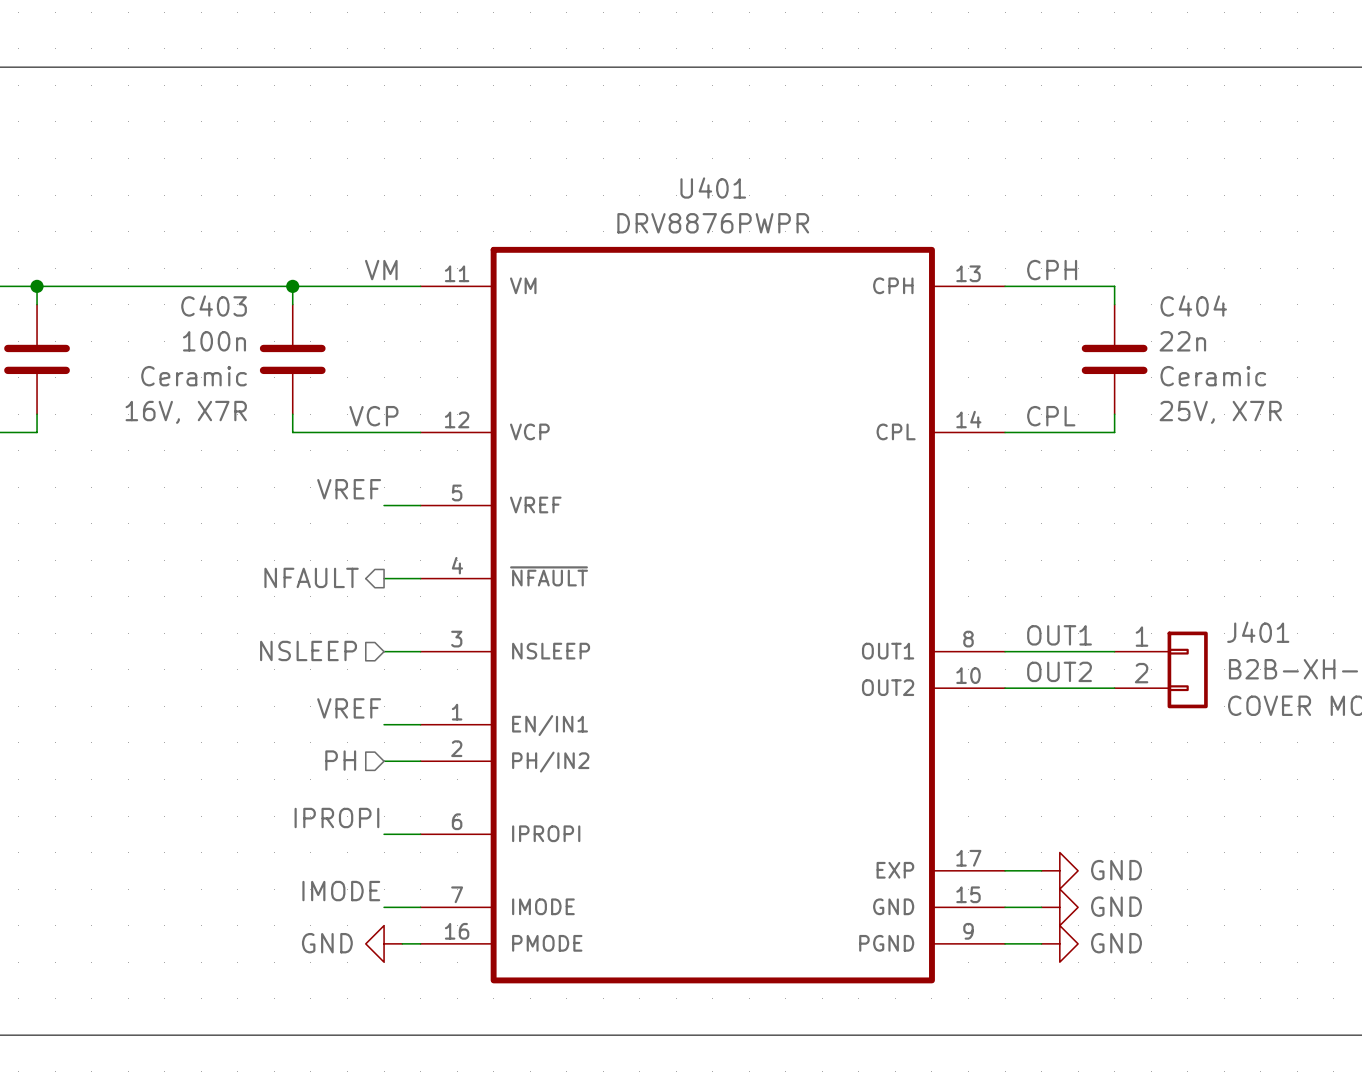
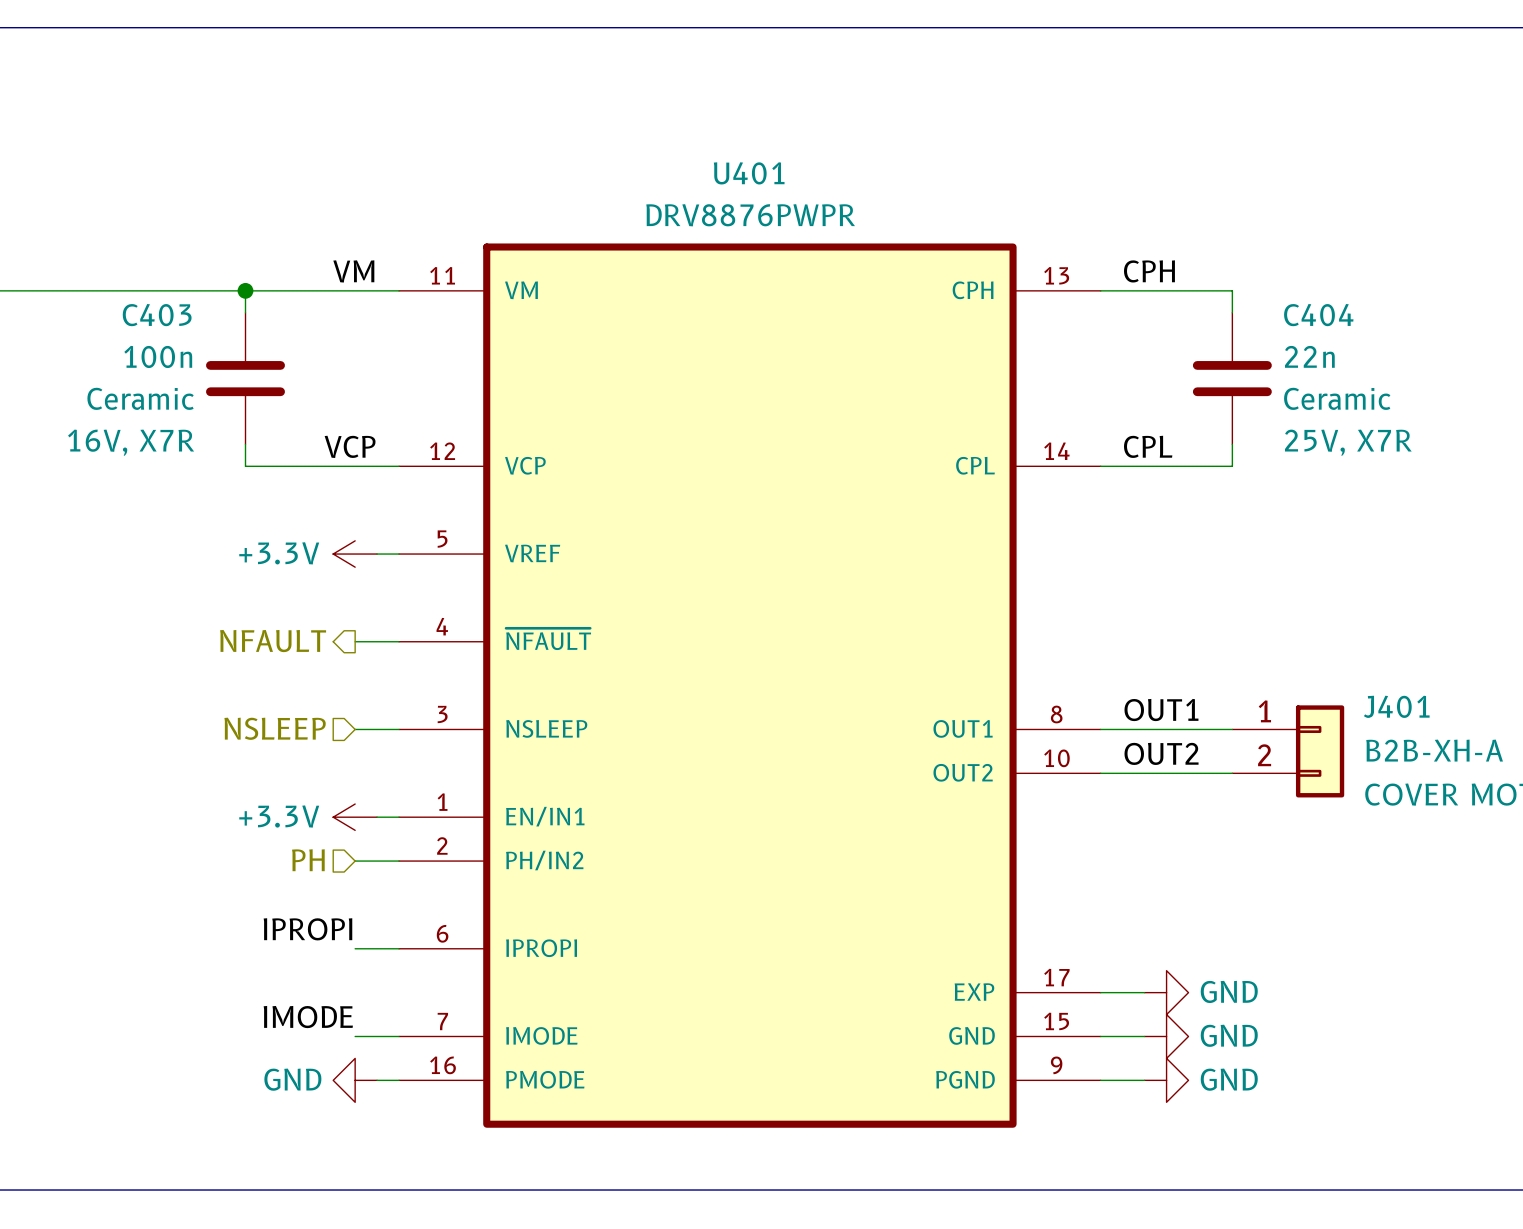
label: VREF (349, 489) -> none
power symbol: none -> +3.3V (355, 554)
label: VREF (349, 708) -> none
power symbol: none -> +3.3V (355, 817)

